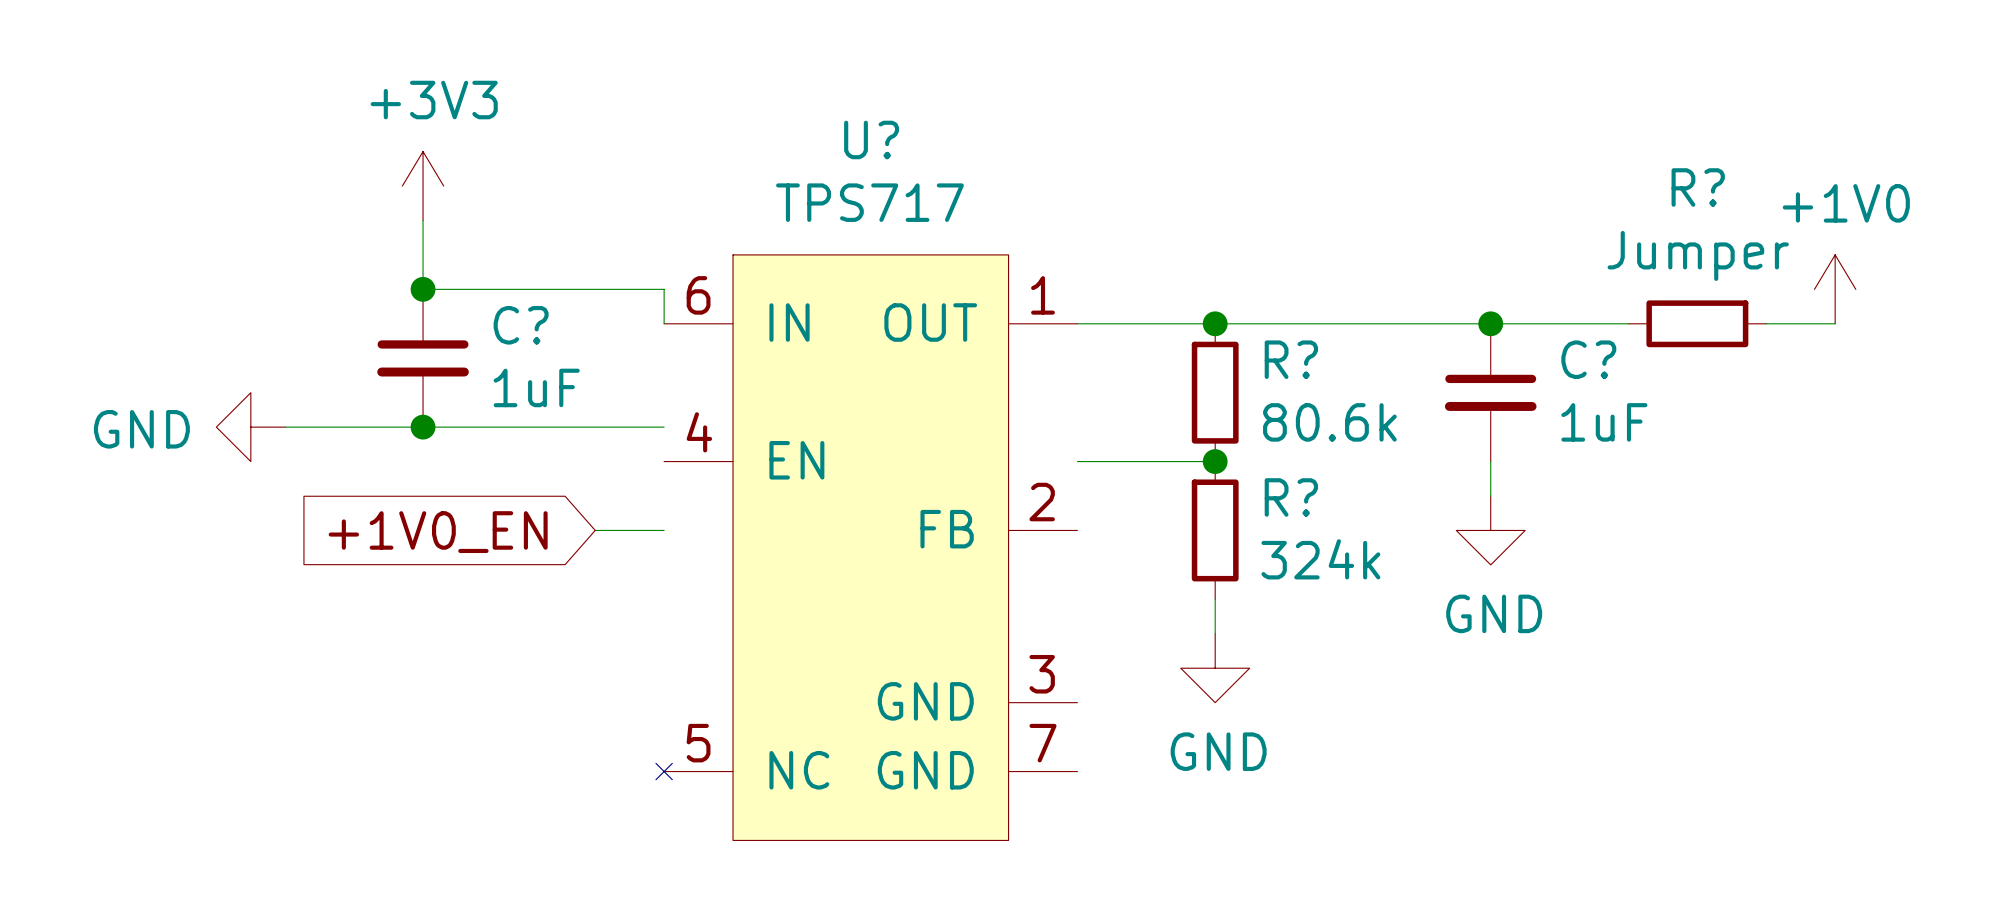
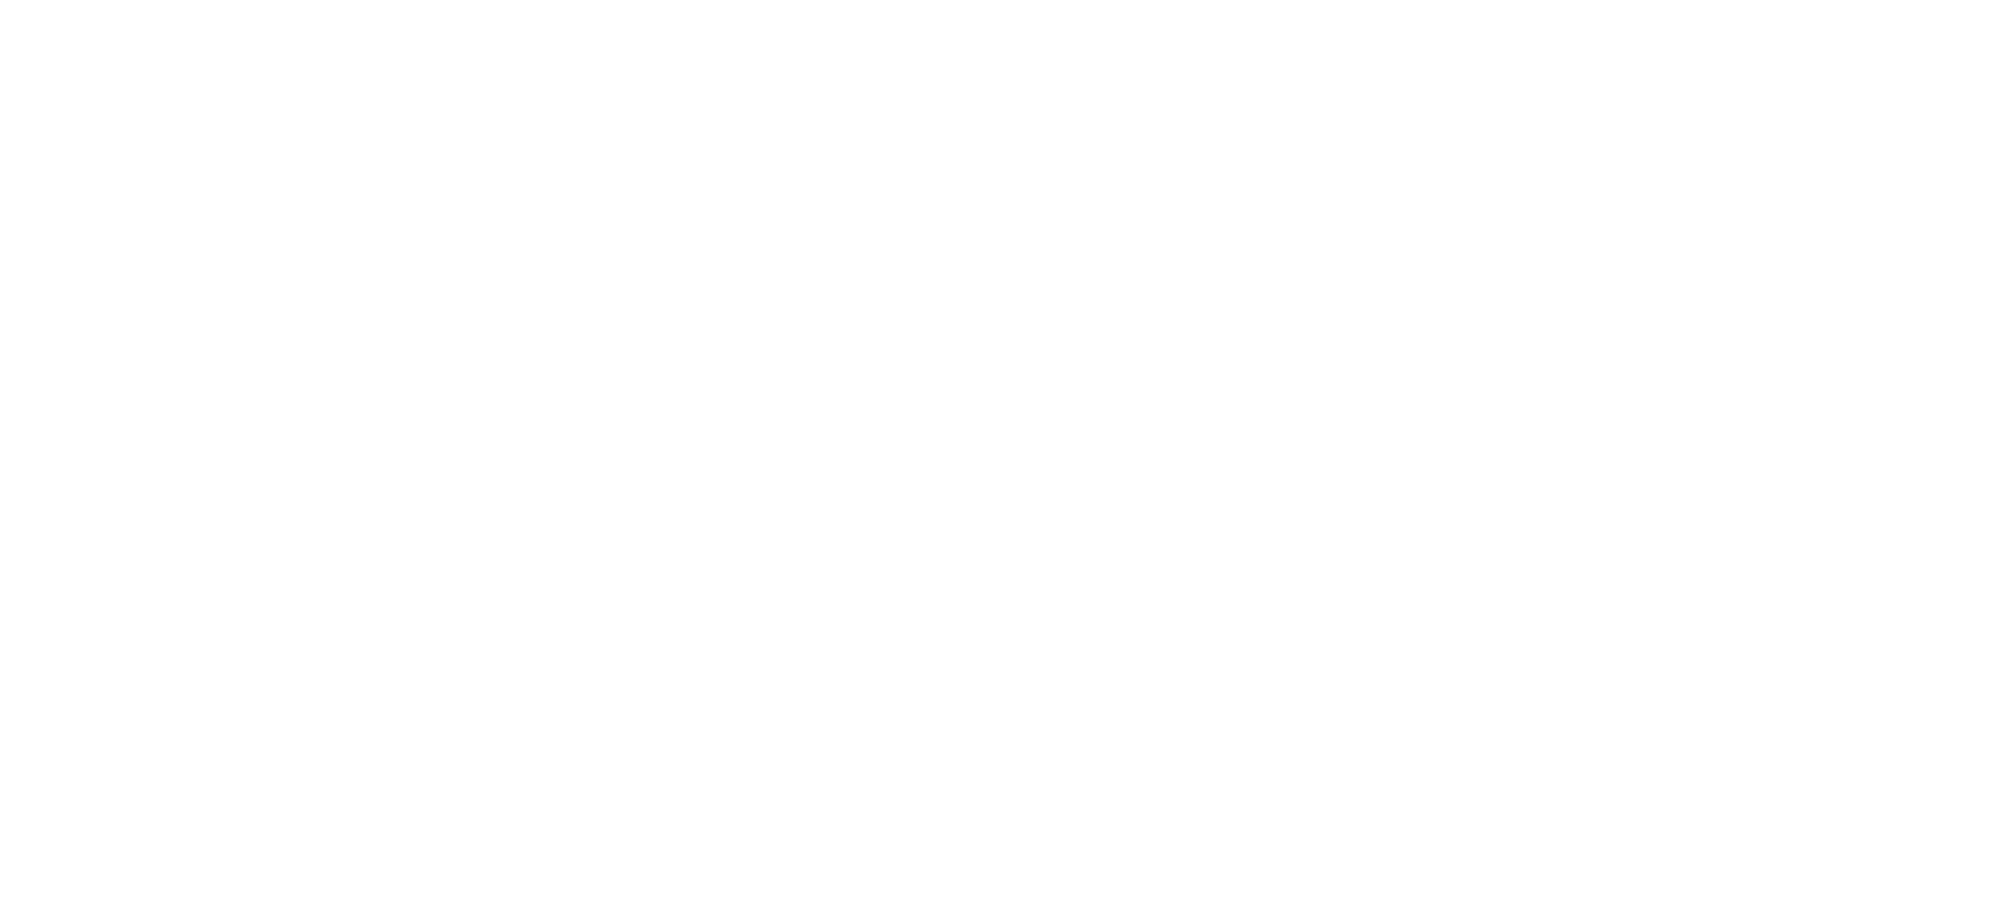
power symbol: +3V3 (423, 186) -> none
wire: (423, 220) (423, 289) (664, 289) (664, 323) -> none
junction: (423, 289) -> none
power symbol: +1V0 (1835, 289) -> none
wire: (1077, 323) (1628, 323) -> none
junction: (1215, 323) -> none
junction: (1490, 323) -> none
R?: Jumper (1697, 323) -> none
wire: (1766, 323) (1835, 323) -> none
C?: 1uF (423, 358) -> none
R?: 80.6k (1215, 392) -> none
C?: 1uF (1490, 392) -> none
power symbol: GND (250, 427) -> none
wire: (285, 427) (664, 427) -> none
junction: (423, 427) -> none
wire: (1077, 461) (1215, 461) -> none
junction: (1215, 461) -> none
wire: (1490, 461) (1490, 496) -> none
wire: (595, 530) (664, 530) -> none
R?: 324k (1215, 530) -> none
power symbol: GND (1490, 530) -> none
global label: +1V0_EN (438, 532) -> none
U?: TPS717 (866, 547) -> none
wire: (1215, 599) (1215, 633) -> none
power symbol: GND (1215, 668) -> none

